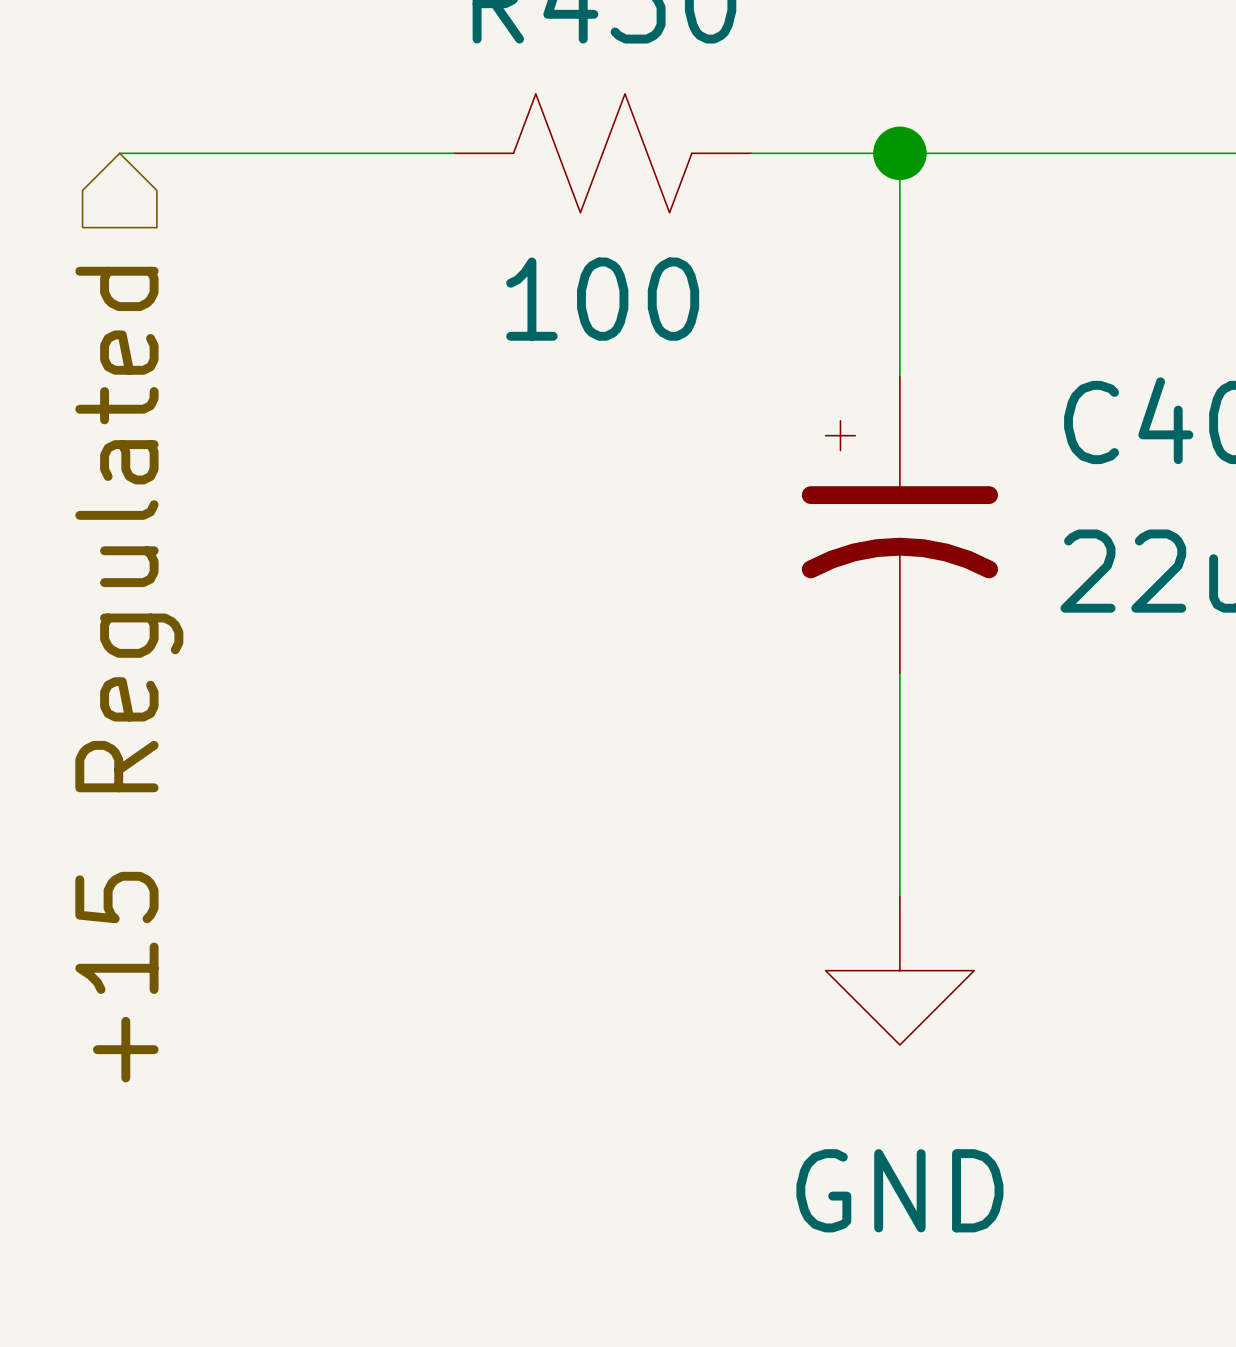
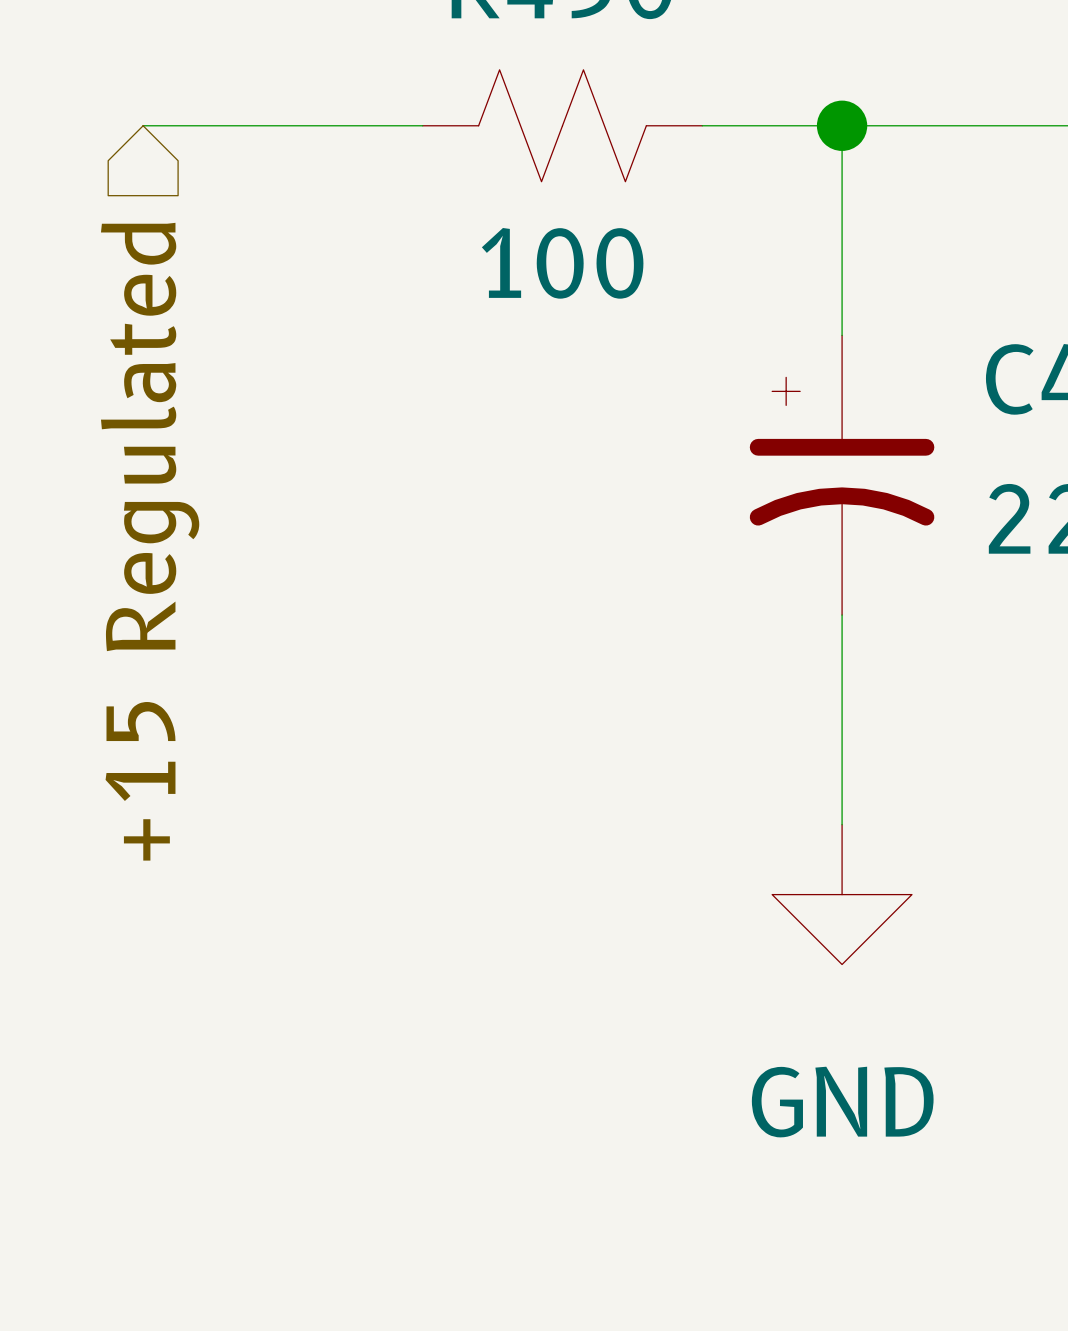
wire: (119, 153) (156, 153) -> none
hierarchical label position: +15 Regulated (129, 674) -> +15 Regulated (150, 541)

